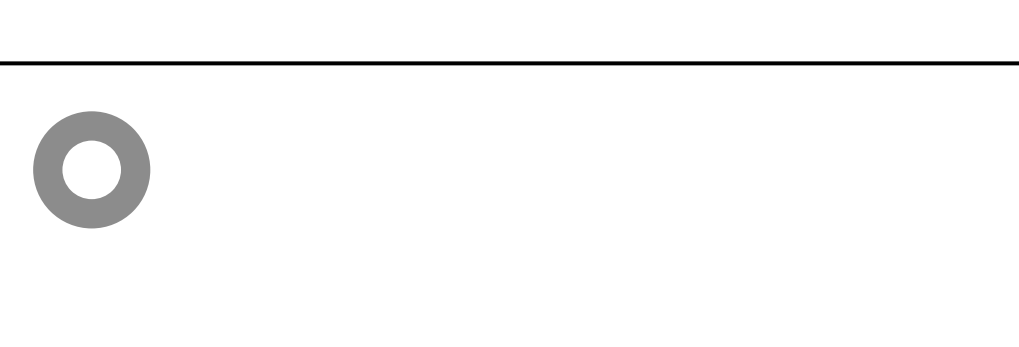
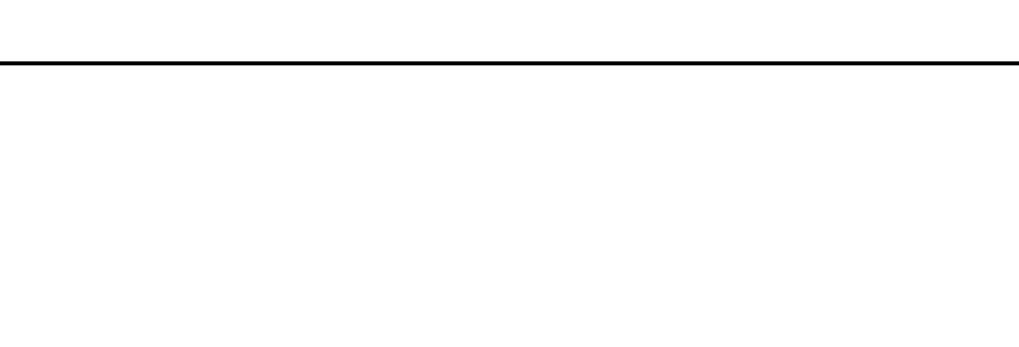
part: (91, 169) -> none

